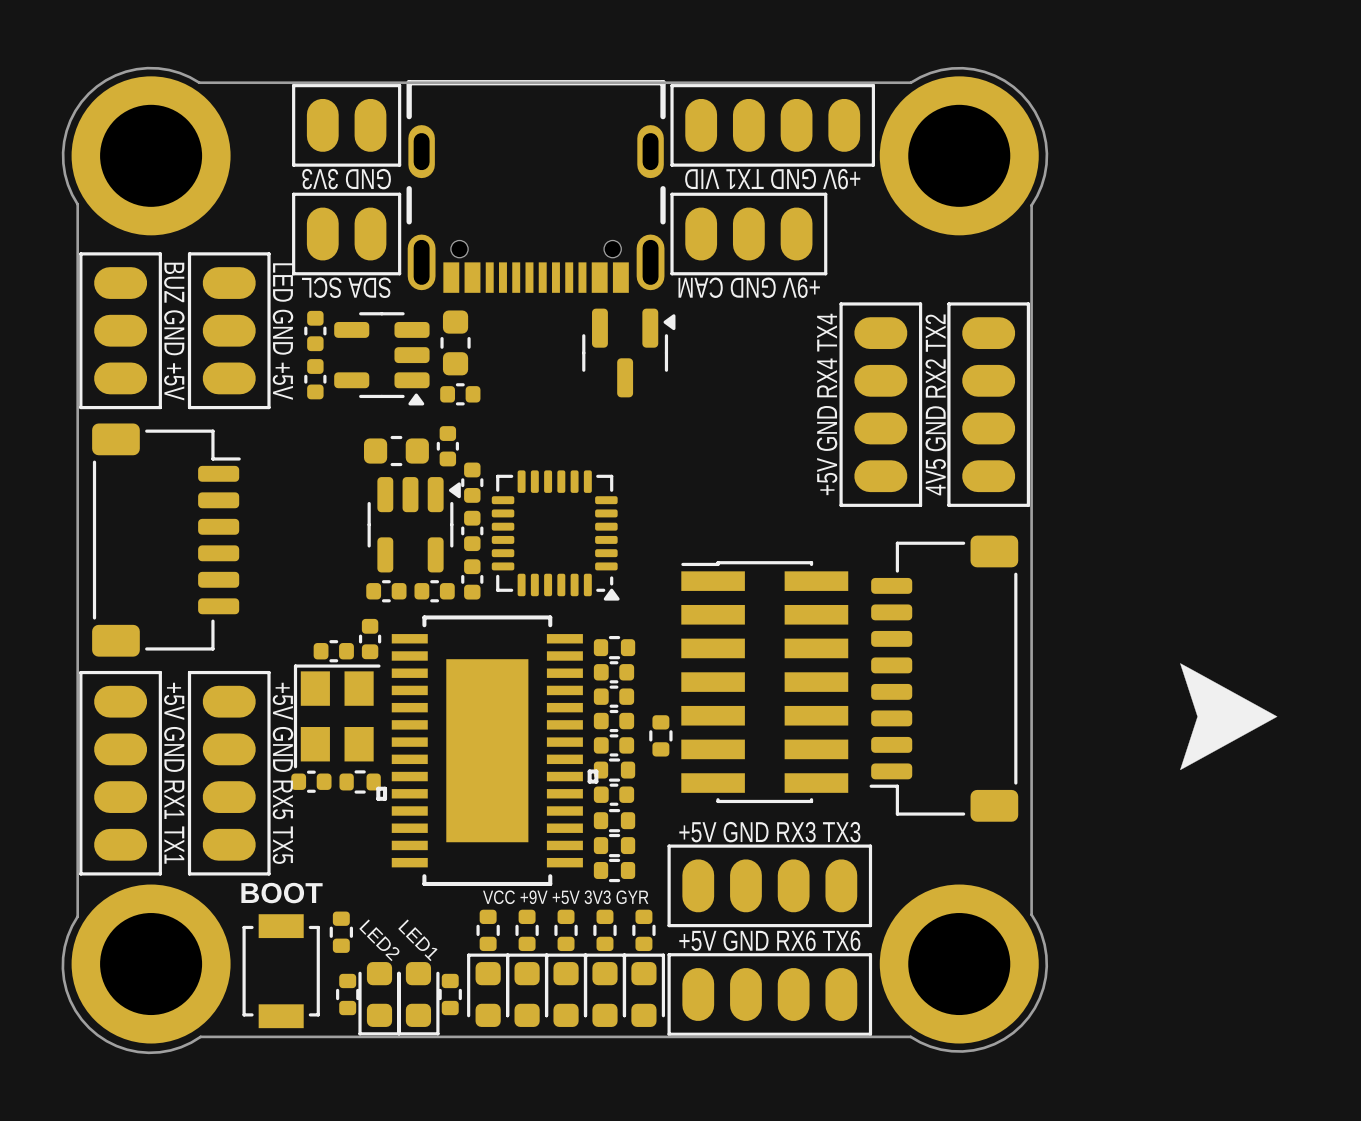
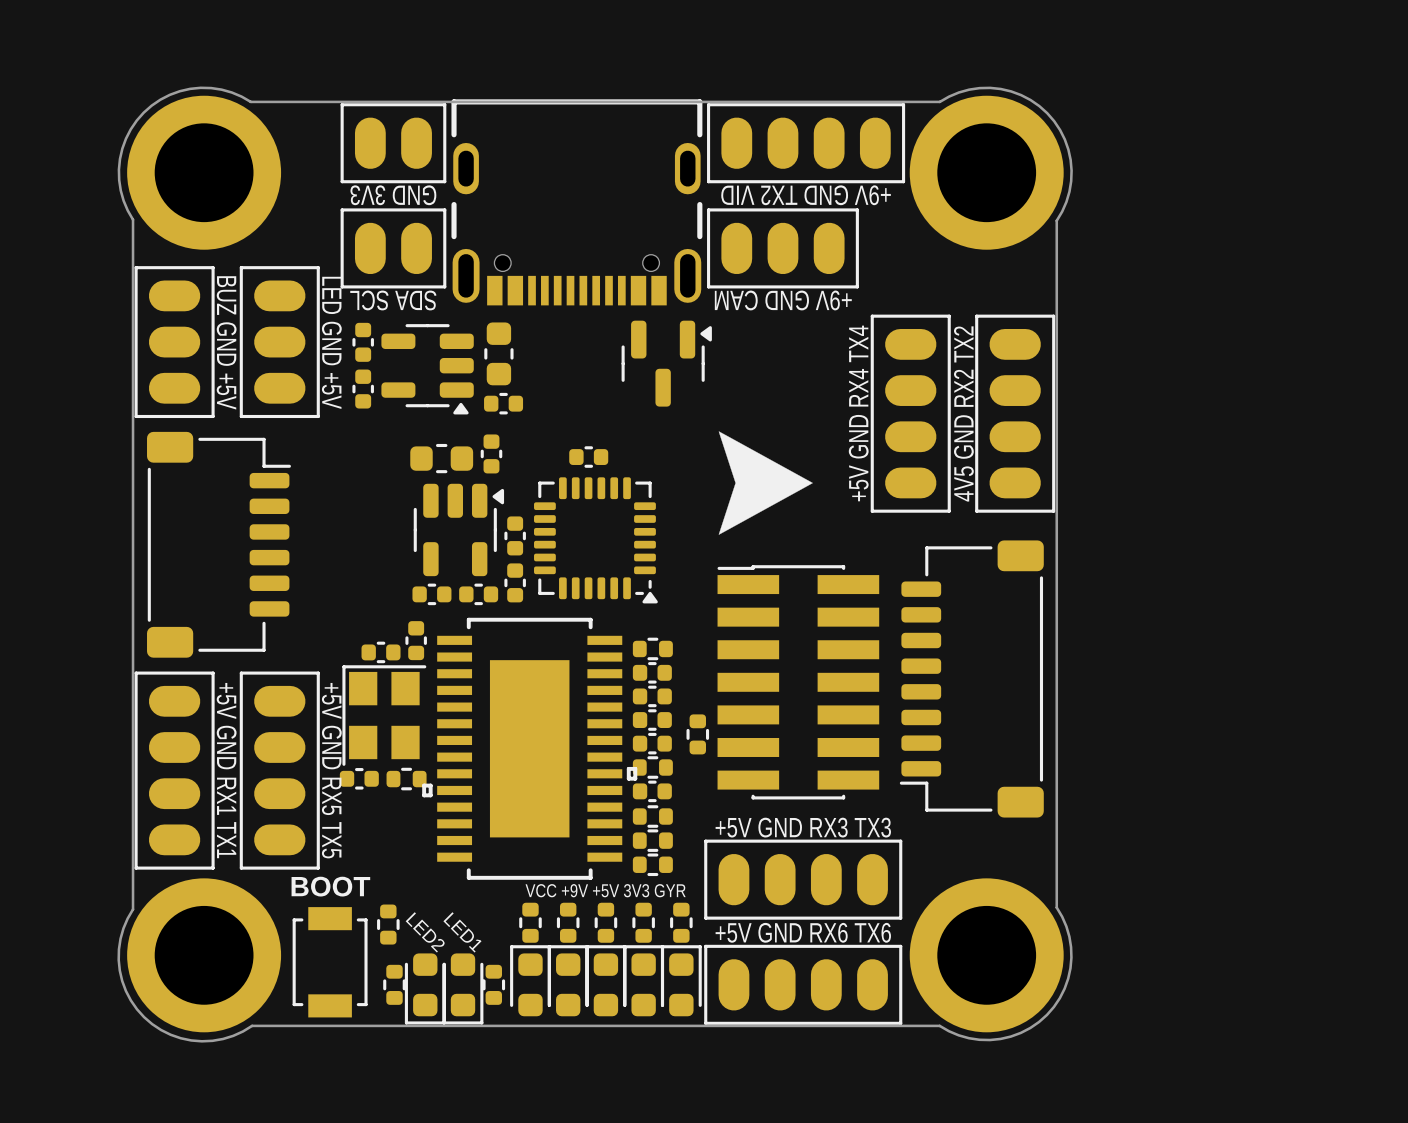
text: +9V GND TX1 VID (772, 179) -> +9V GND TX2 VID (806, 195)
part rotation: 0° (472, 482) -> 90° clockwise (588, 457)
part position: (472, 482) -> (588, 457)
drawing position: (1228, 716) -> (765, 483)

